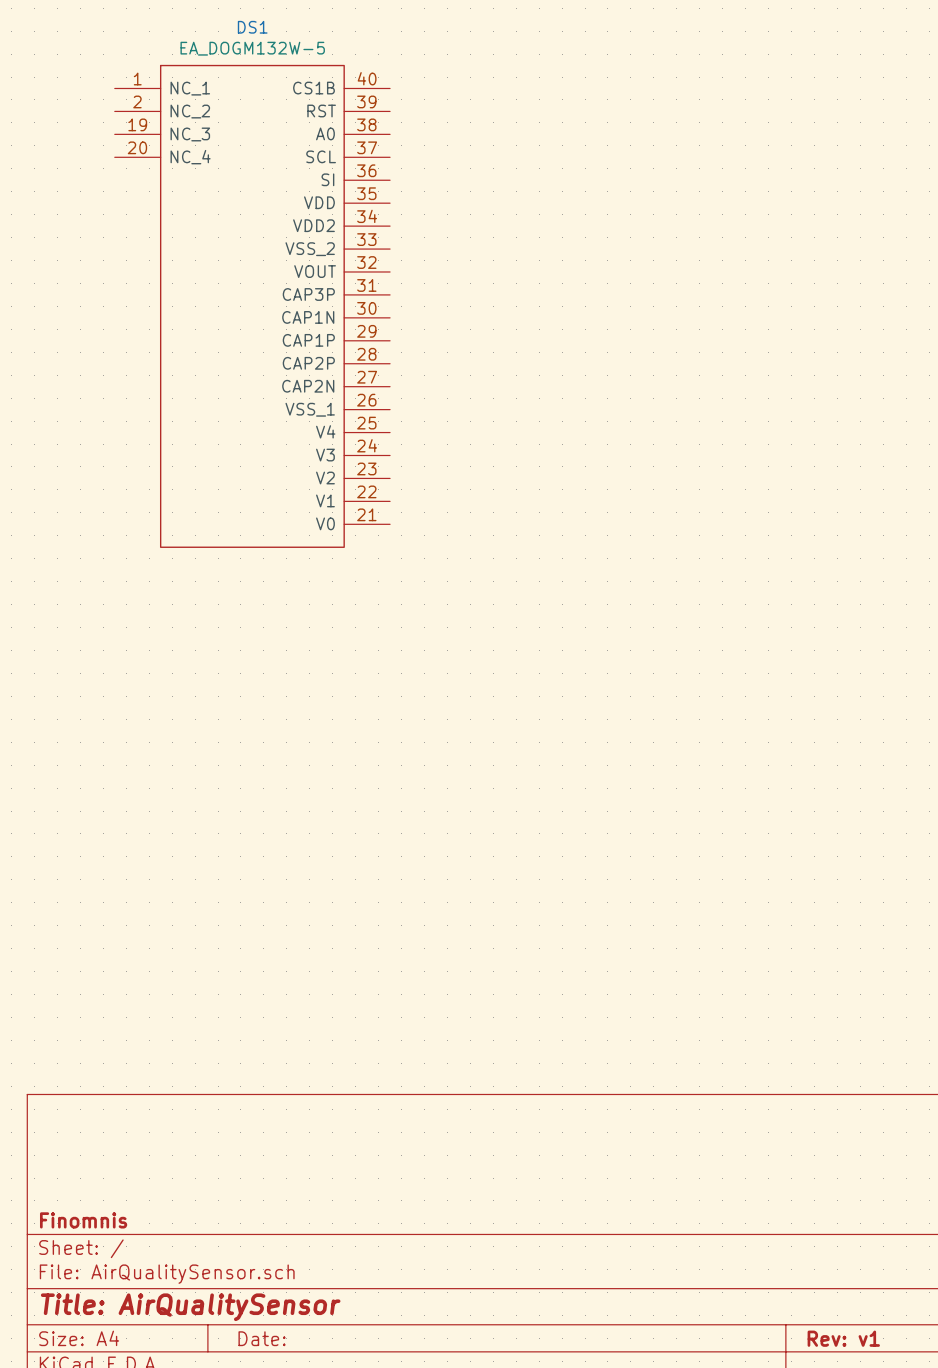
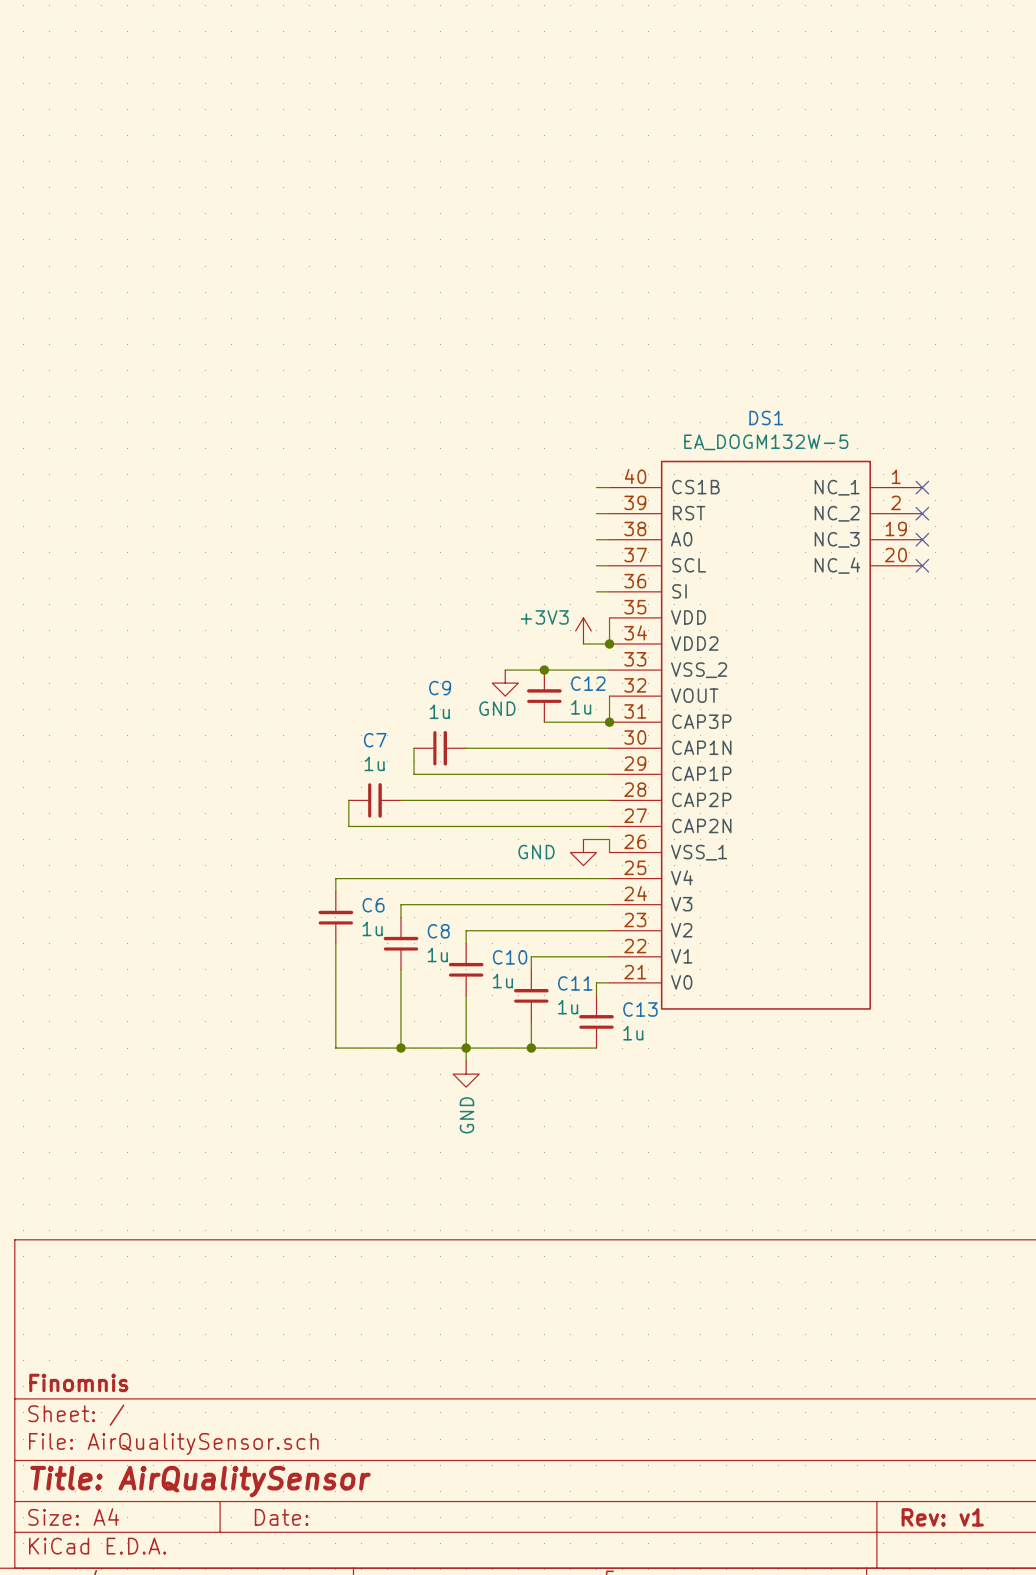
DS1 flip: as is (252, 306) -> left-right (765, 735)
DS1 position: (252, 306) -> (765, 735)
wire: none -> (596, 487) (609, 487)
no-connect mark: none -> (922, 487)
wire: none -> (596, 513) (609, 513)
no-connect mark: none -> (922, 513)
wire: none -> (596, 539) (609, 539)
no-connect mark: none -> (922, 539)
wire: none -> (596, 565) (609, 565)
no-connect mark: none -> (922, 565)
wire: none -> (596, 591) (609, 591)
wire: none -> (609, 617) (609, 643) (583, 643)
power symbol: none -> +3V3 (583, 630)
junction: none -> (609, 643)
wire: none -> (505, 670) (609, 670)
junction: none -> (544, 670)
power symbol: none -> GND (505, 683)
C12: none -> 1u (544, 696)
wire: none -> (609, 696) (609, 722) (544, 722)
junction: none -> (609, 722)
wire: none -> (414, 748) (414, 774) (609, 774)
C9: none -> 1u (440, 748)
wire: none -> (466, 748) (609, 748)
wire: none -> (348, 800) (348, 826) (609, 826)
C7: none -> 1u (374, 800)
wire: none -> (400, 800) (609, 800)
wire: none -> (583, 839) (609, 839) (609, 852)
power symbol: none -> GND (583, 852)
wire: none -> (609, 878) (335, 878) (335, 891)
wire: none -> (609, 904) (400, 904) (400, 917)
C6: none -> 1u (335, 917)
wire: none -> (609, 930) (466, 930) (466, 943)
wire: none -> (335, 943) (335, 1048) (596, 1048)
C8: none -> 1u (400, 943)
wire: none -> (609, 956) (531, 956) (531, 969)
wire: none -> (400, 969) (400, 1048)
C10: none -> 1u (466, 969)
wire: none -> (609, 982) (596, 982) (596, 995)
wire: none -> (466, 995) (466, 1061)
C11: none -> 1u (531, 995)
wire: none -> (531, 1021) (531, 1048)
C13: none -> 1u (596, 1021)
junction: none -> (400, 1048)
junction: none -> (466, 1048)
junction: none -> (531, 1048)
power symbol: none -> GND (466, 1074)

